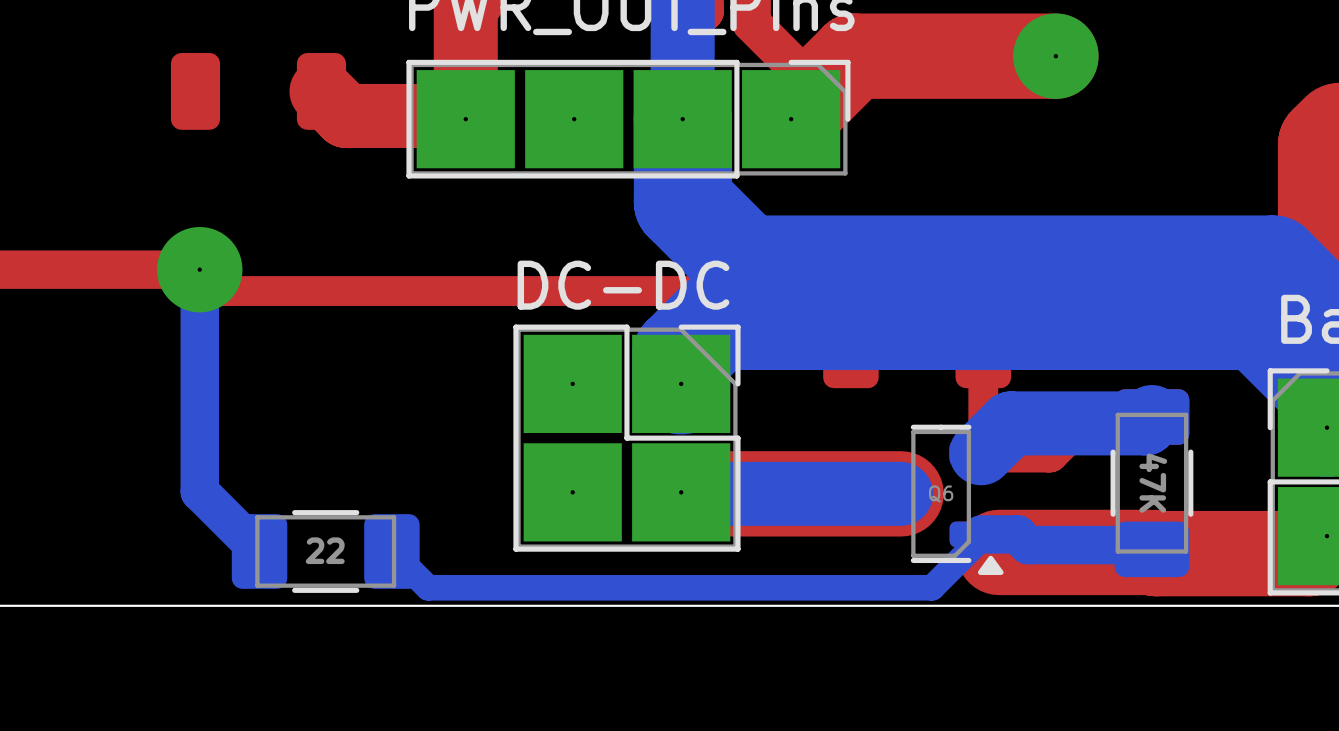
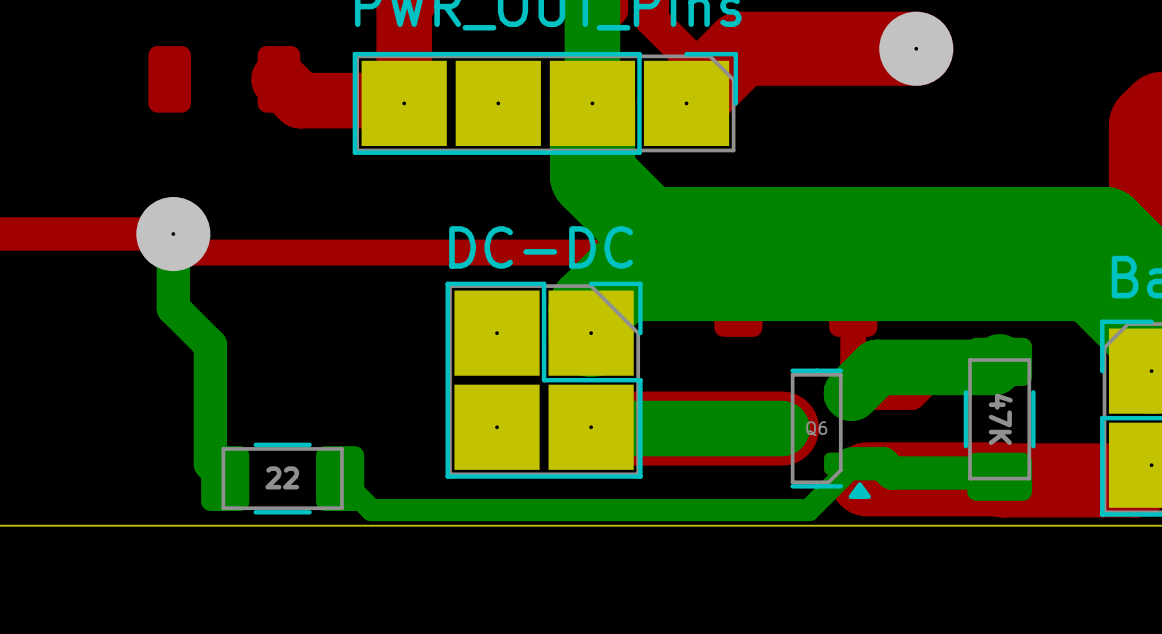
bottom track: (199, 355) (199, 491) (242, 534) -> (173, 308) (210, 345) (210, 463)

